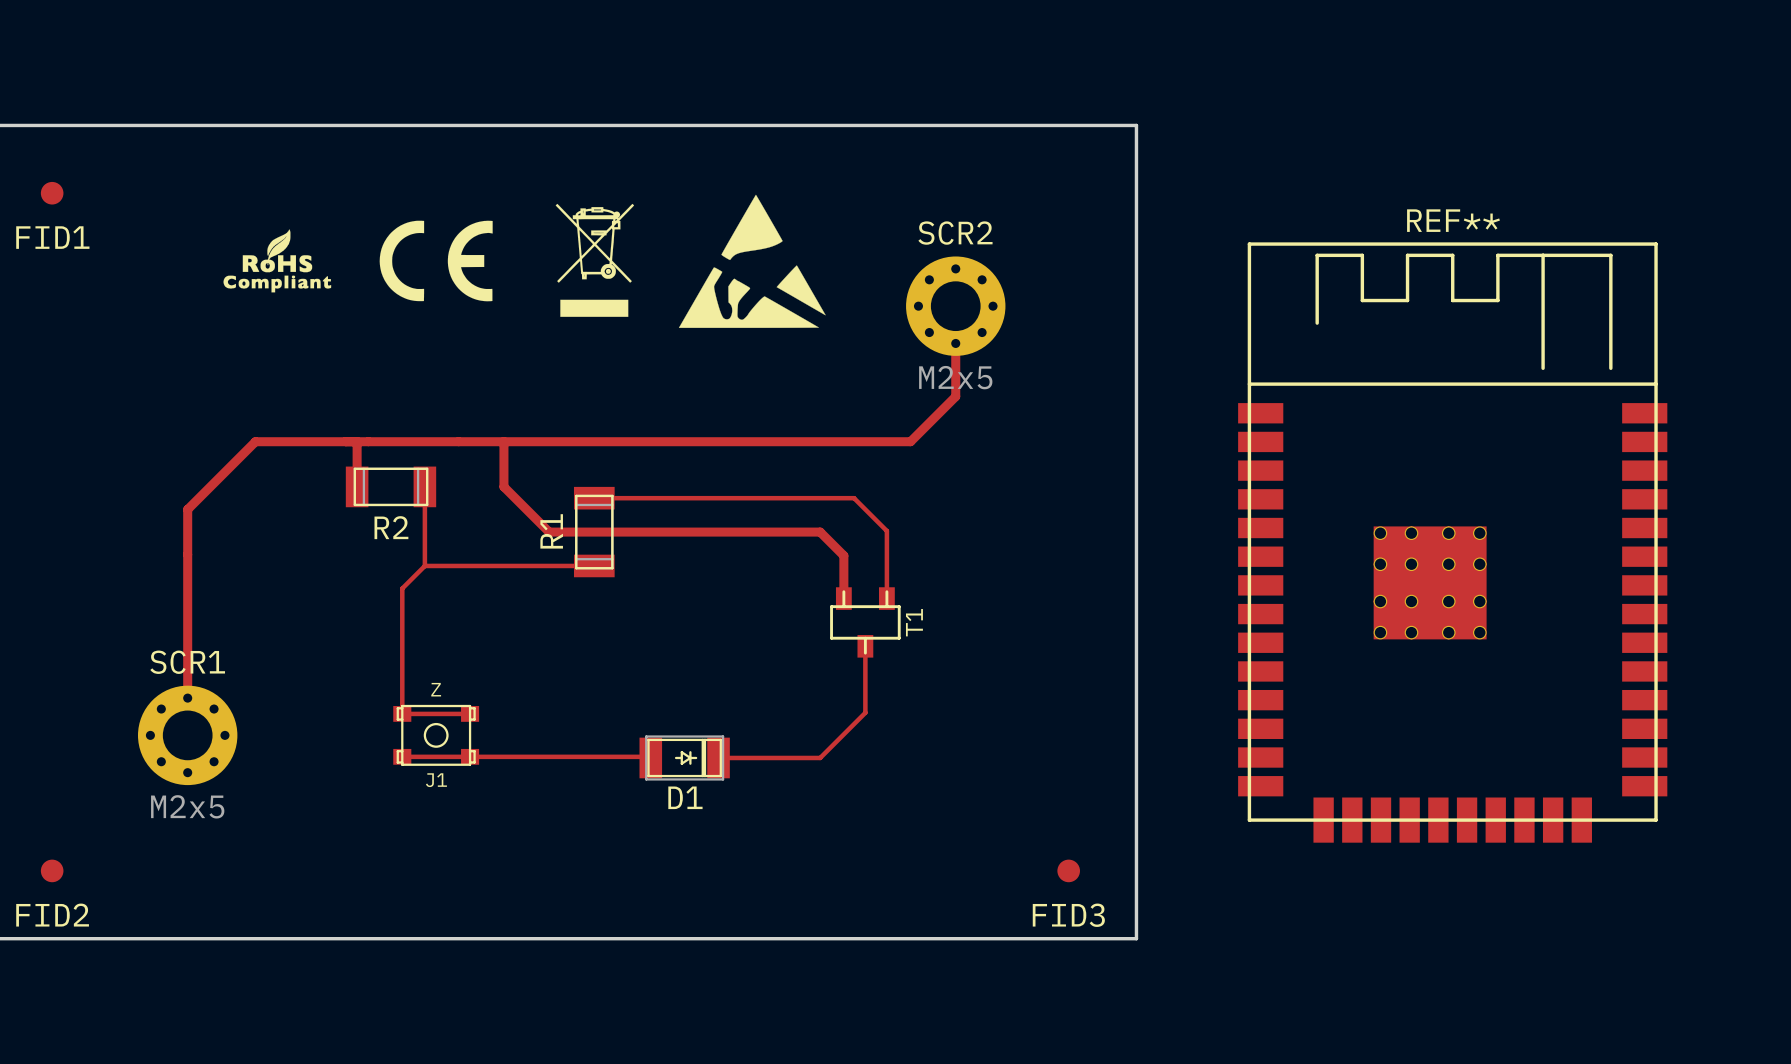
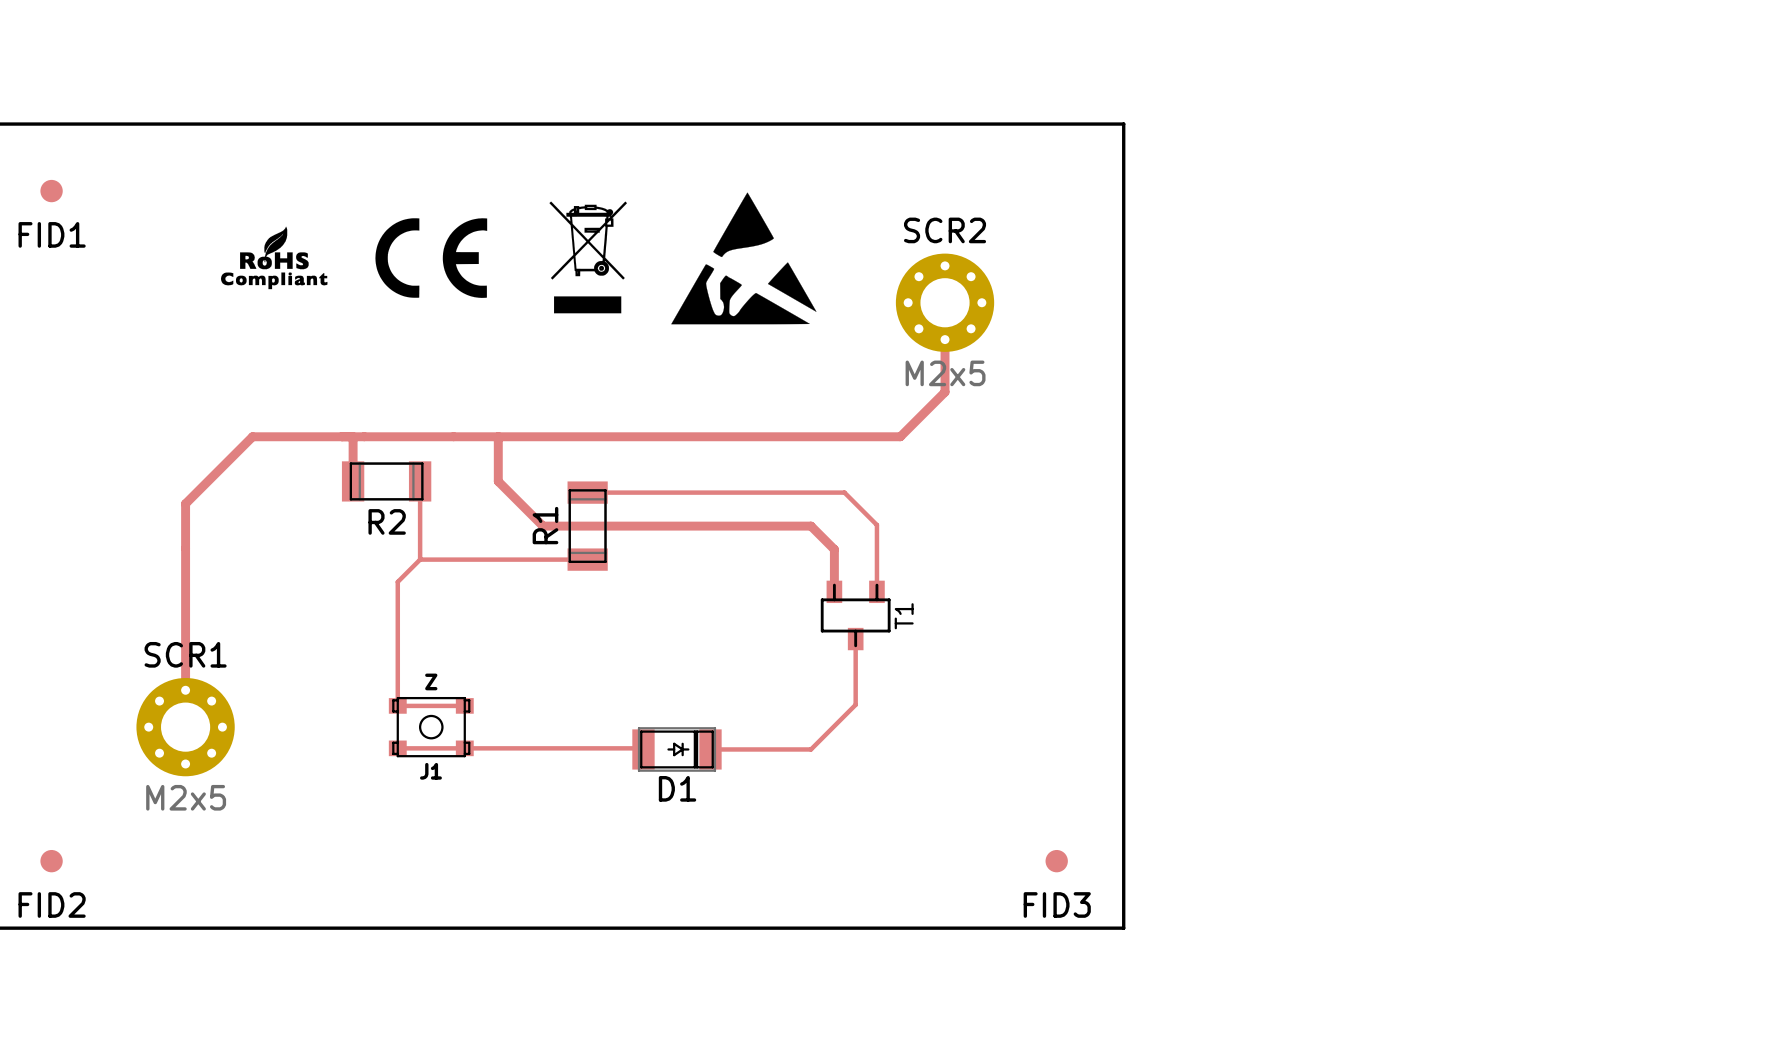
REF**: (1452, 542) -> none

